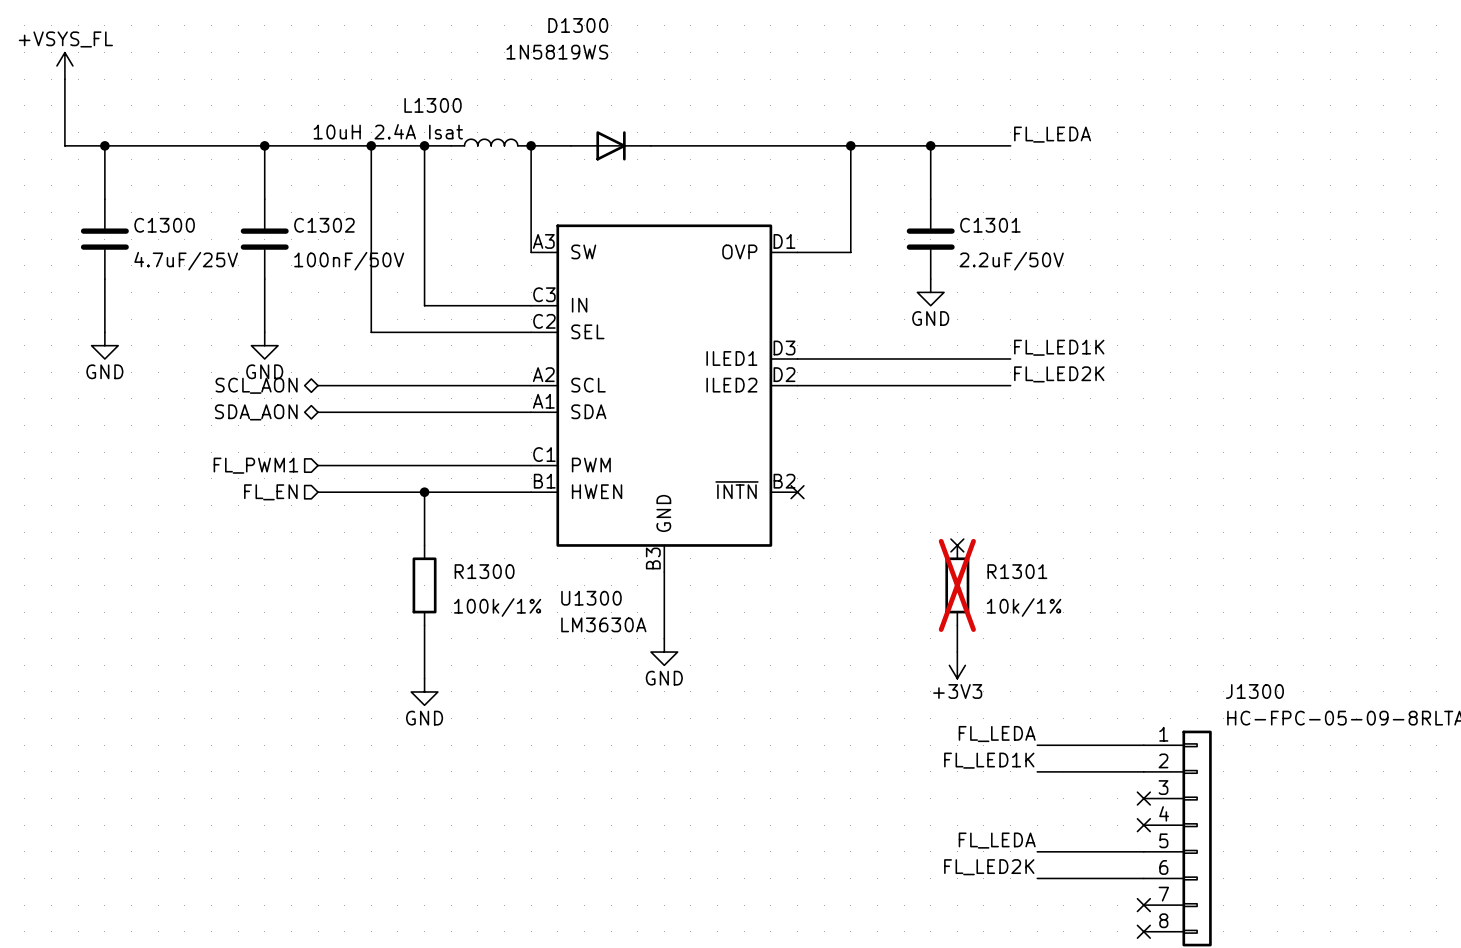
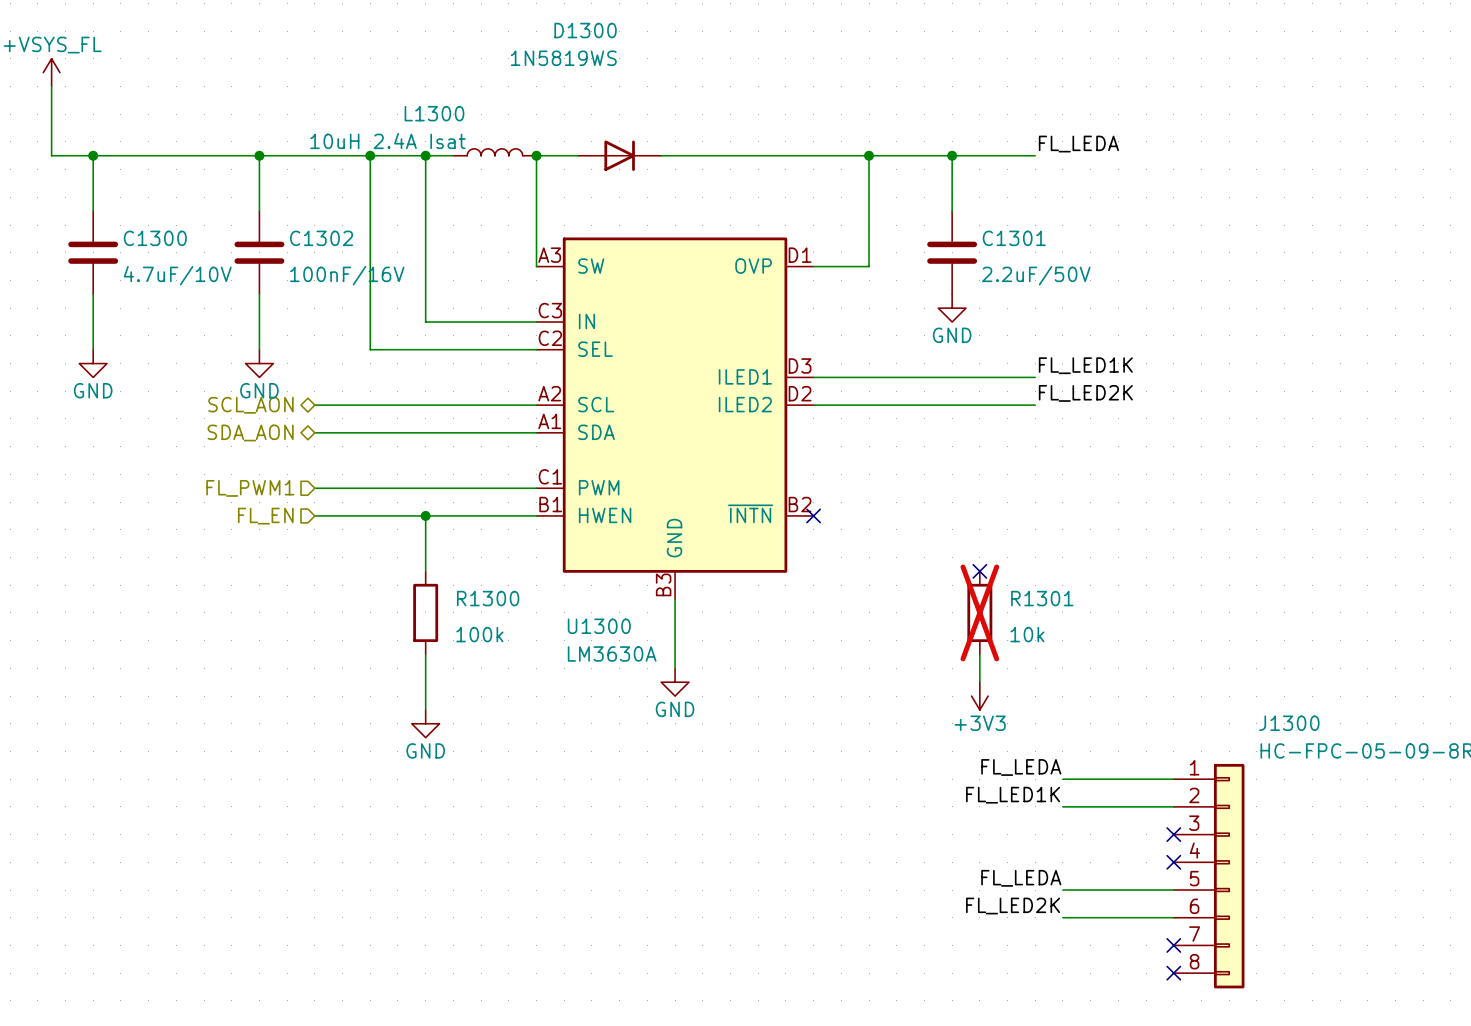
C1300 value: 4.7uF/25V (186, 261) -> 4.7uF/10V (177, 275)
C1302 value: 100nF/50V (349, 261) -> 100nF/16V (347, 275)
R1300 value: 100k/1% (497, 607) -> 100k (479, 634)
R1301 value: 10k/1% (1024, 607) -> 10k (1027, 634)

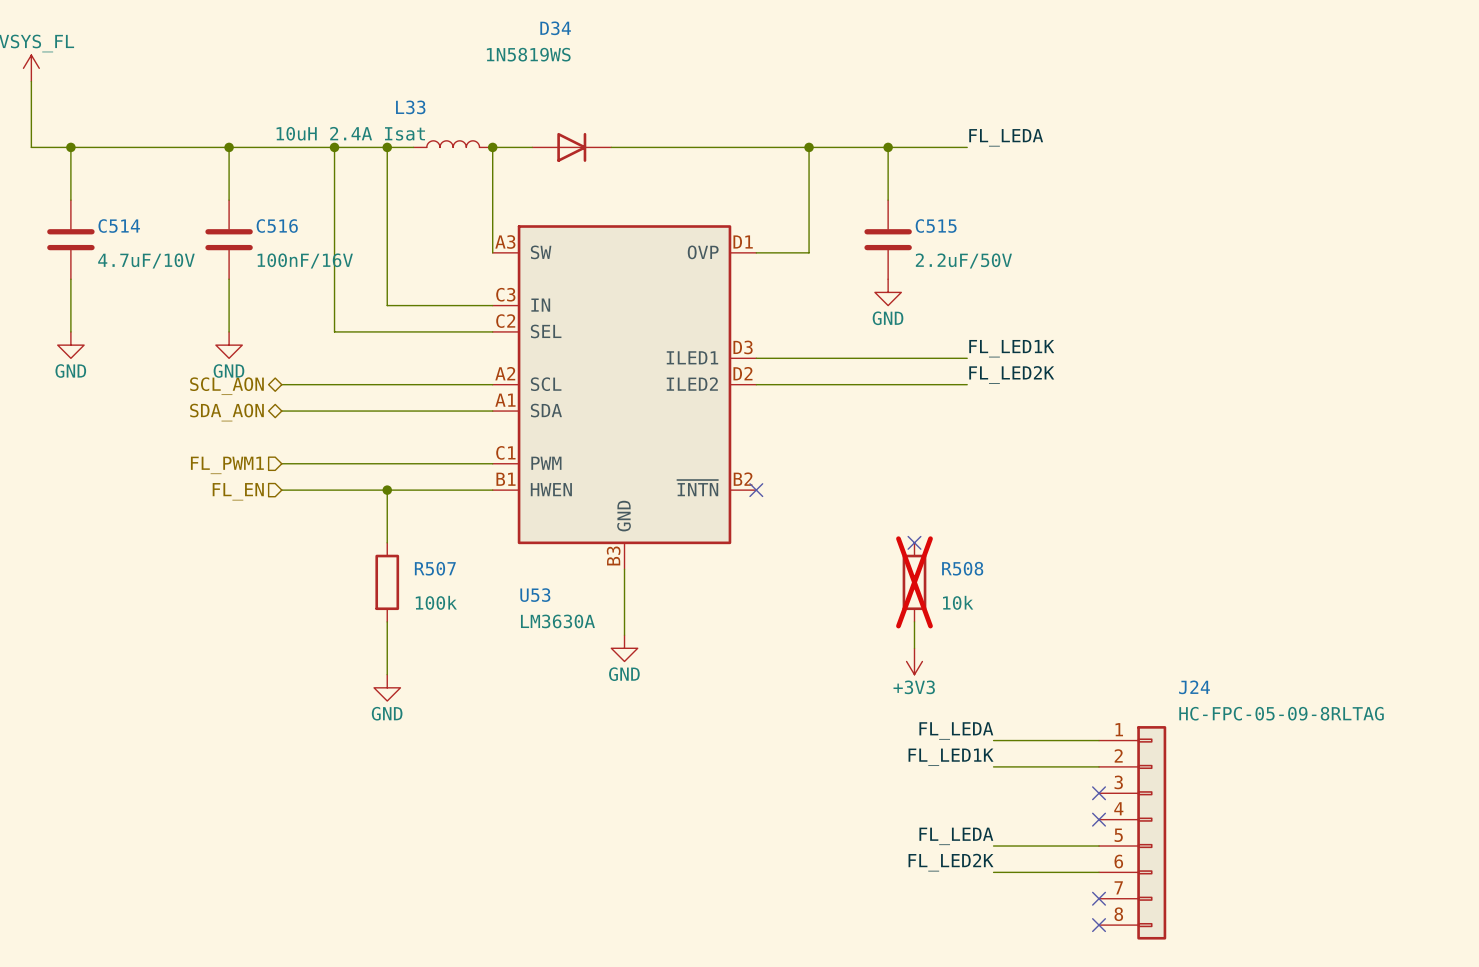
D1300 name: D1300 (585, 30) -> D34 (555, 28)
L1300 name: L1300 (434, 113) -> L33 (410, 107)
C1300 name: C1300 (155, 238) -> C514 (119, 226)
C1302 name: C1302 (321, 238) -> C516 (277, 226)
C1301 name: C1301 (1014, 238) -> C515 (936, 226)
R1300 name: R1300 (488, 598) -> R507 (435, 568)
R1301 name: R1301 (1042, 598) -> R508 (962, 568)
U1300 name: U1300 (599, 626) -> U53 (535, 595)
J1300 name: J1300 (1289, 723) -> J24 (1194, 687)

